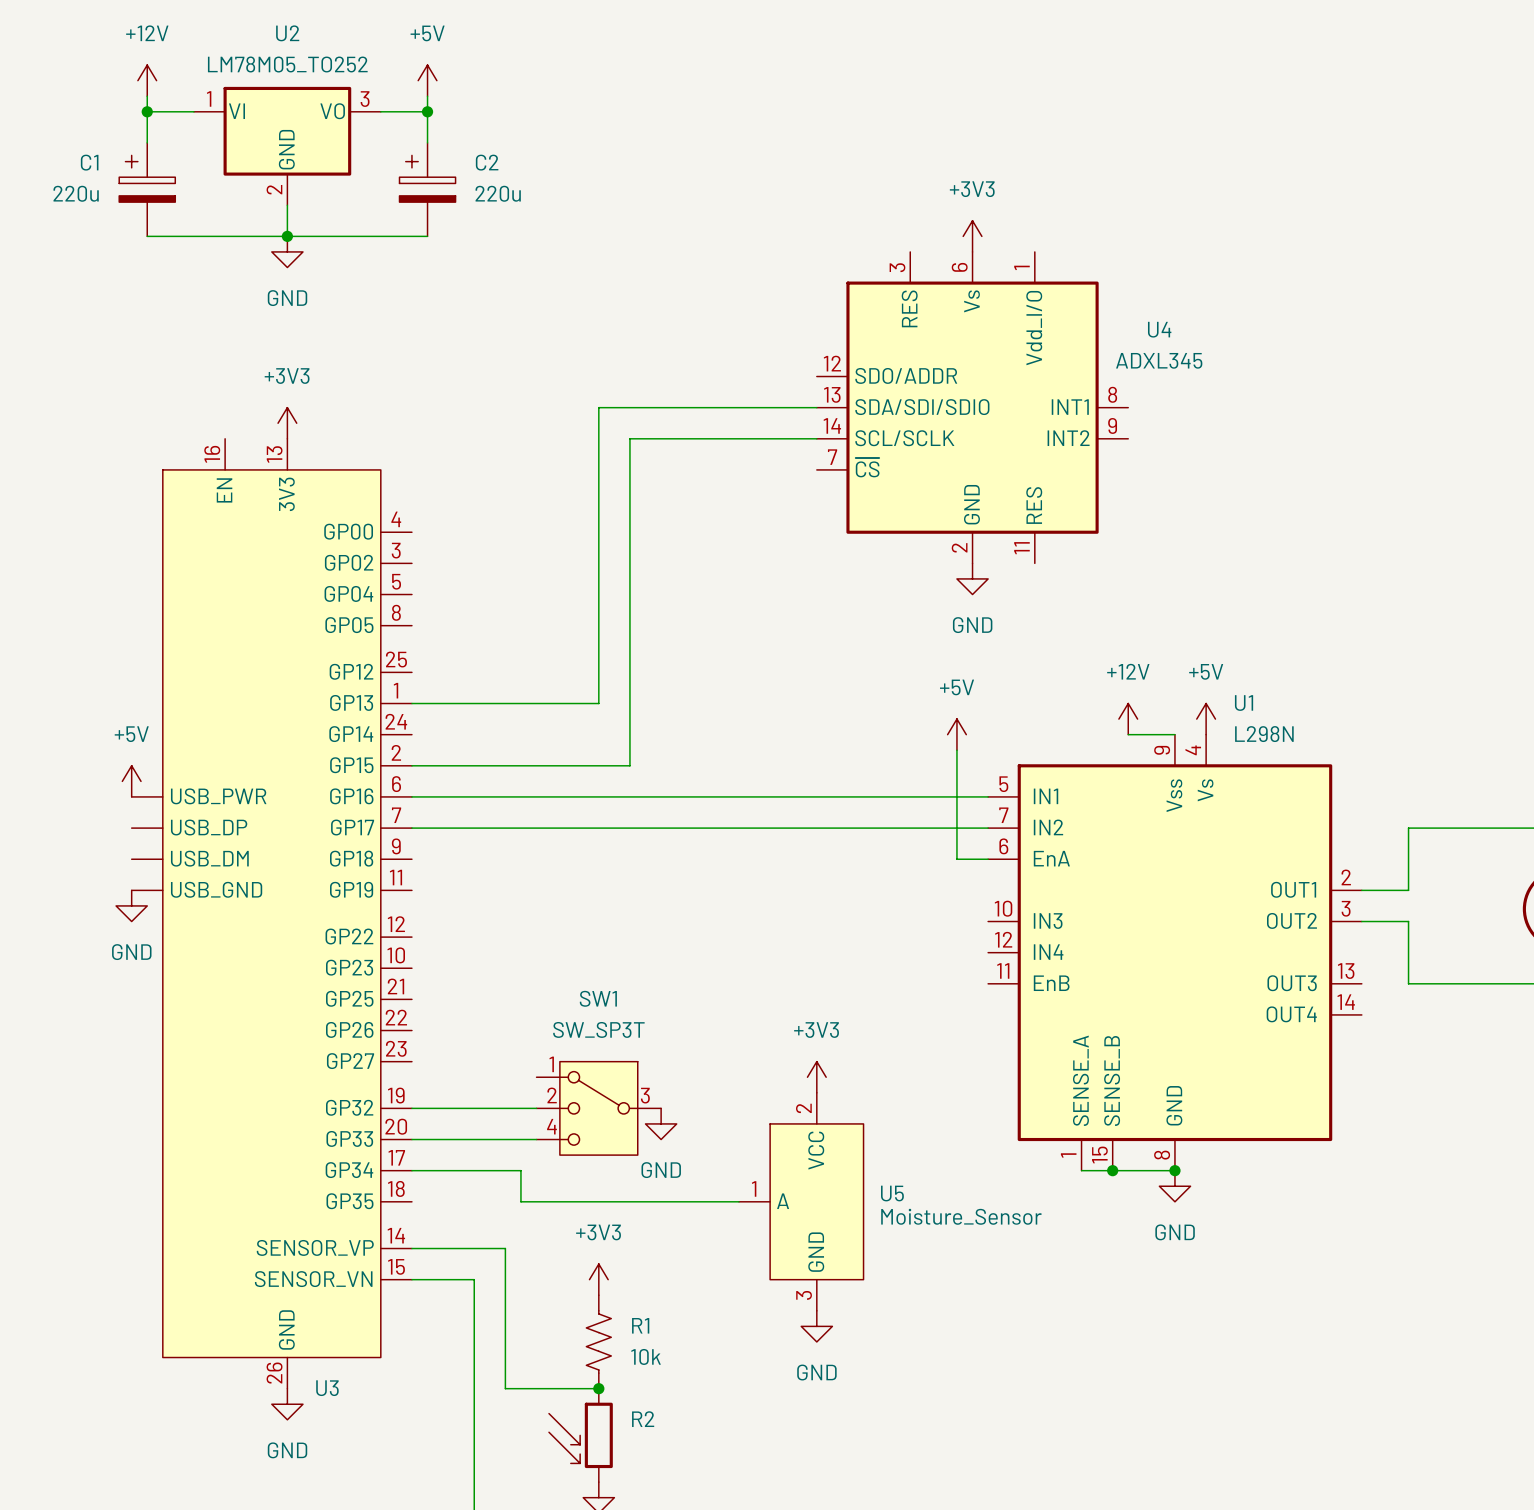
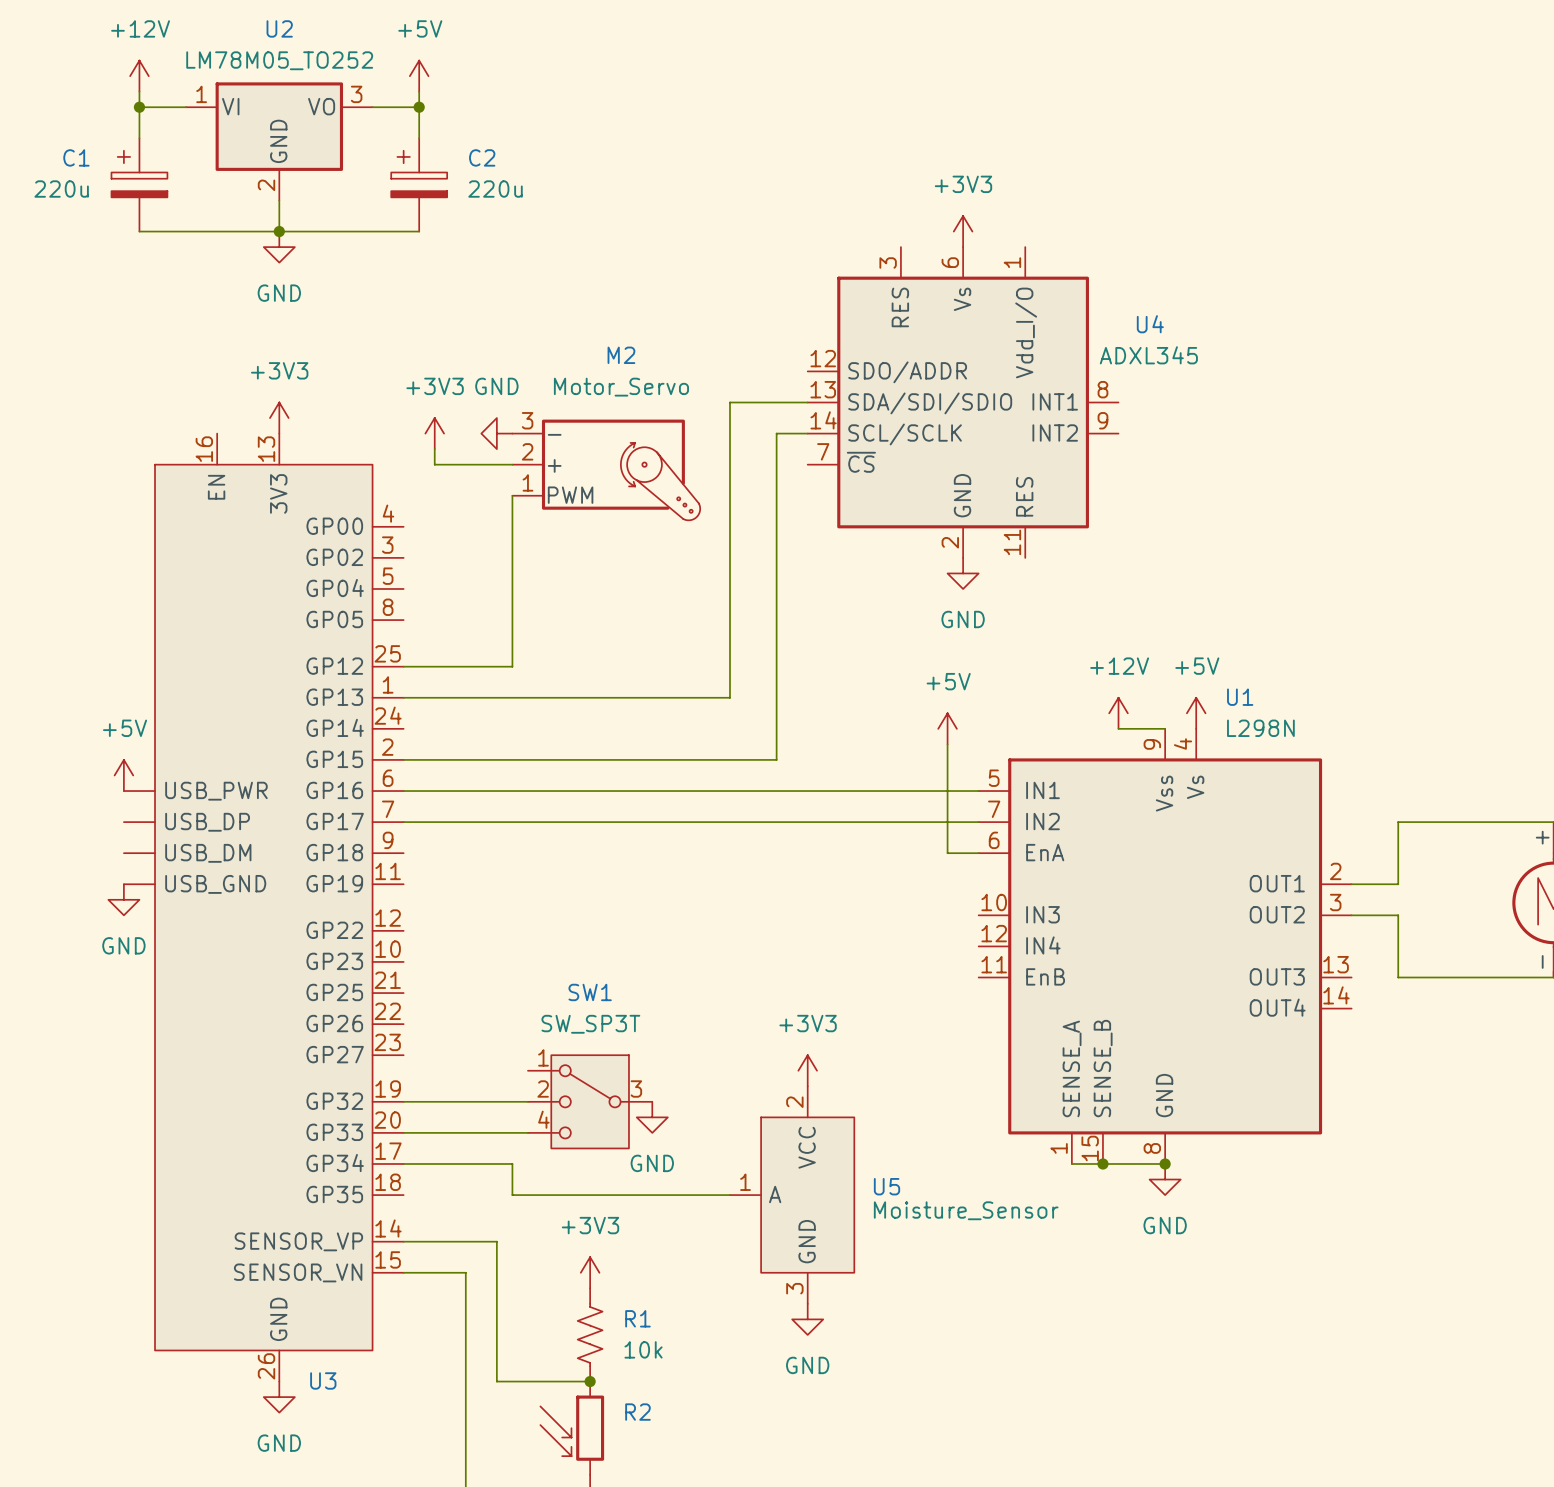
wire: (738, 407) (598, 407) (598, 703) -> (729, 402) (729, 697) (590, 697)
power symbol: none -> +3V3 (434, 433)
power symbol: none -> GND (496, 433)
wire: (785, 438) (629, 438) (629, 765) -> (776, 433) (776, 759) (621, 759)
wire: none -> (434, 449) (434, 464) (512, 464)
M2: none -> Motor_Servo (606, 469)
wire: none -> (512, 495) (512, 666) (403, 666)

